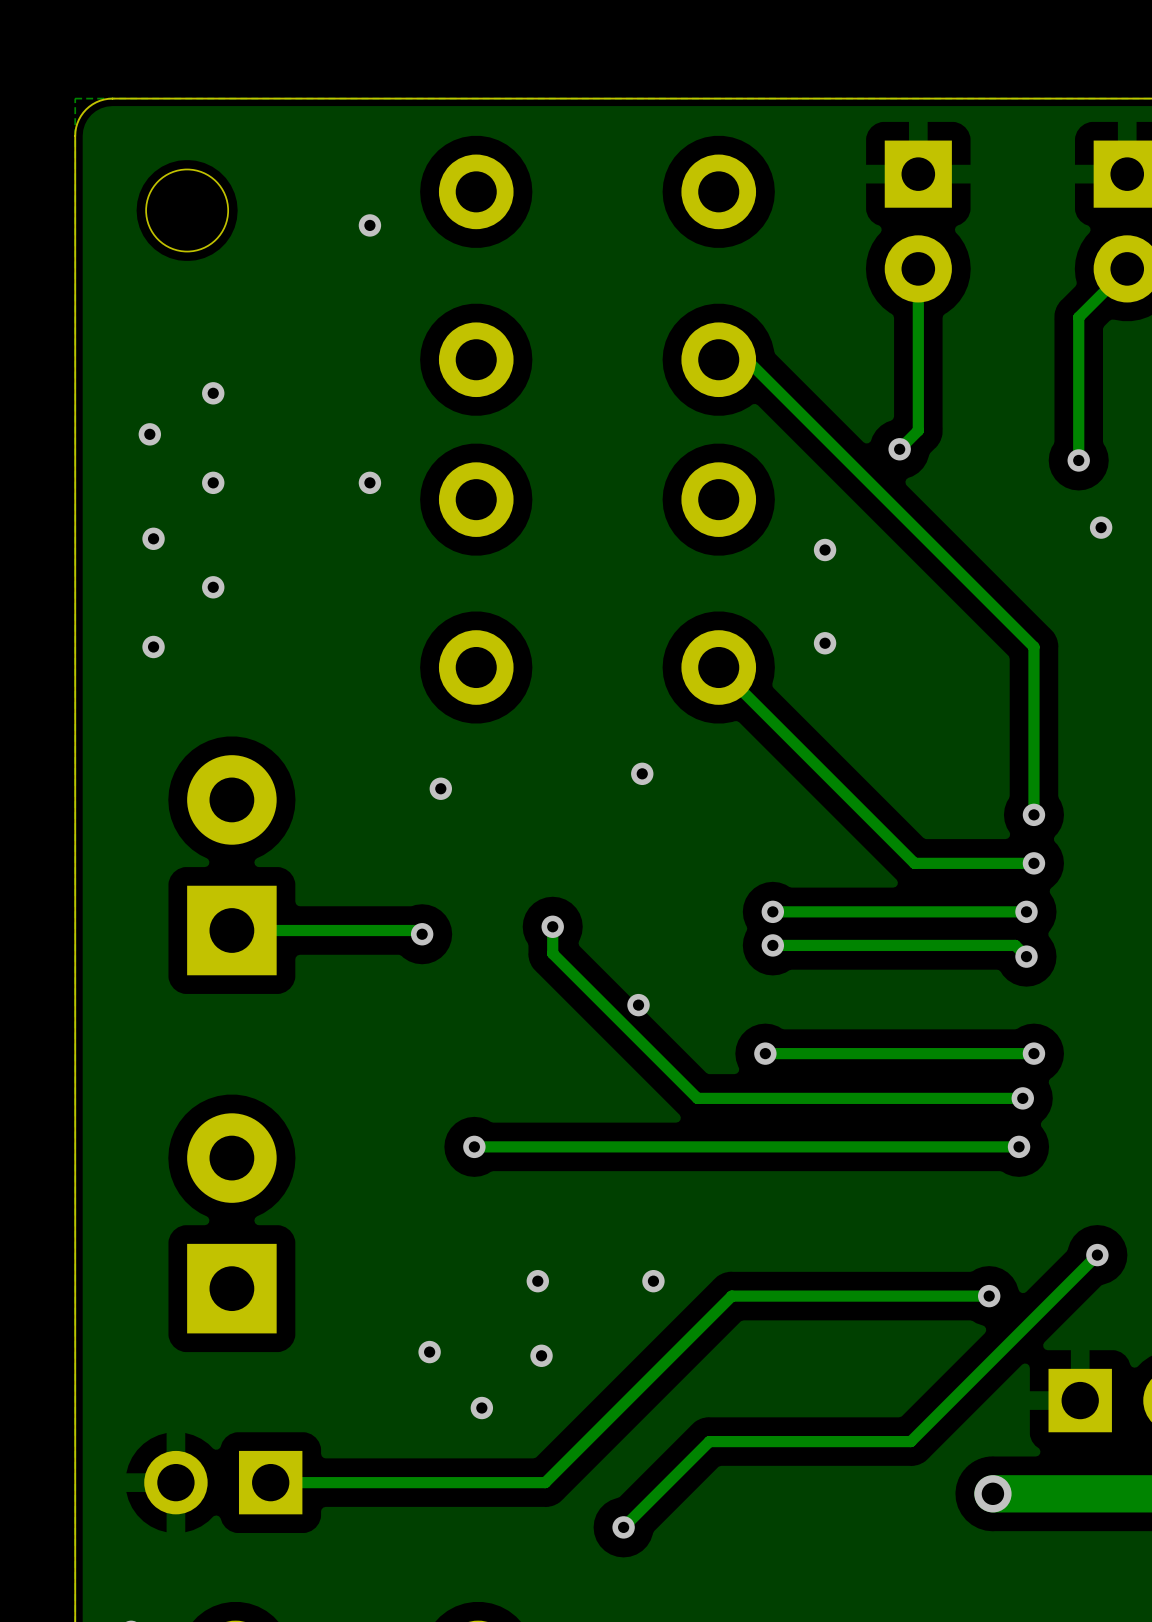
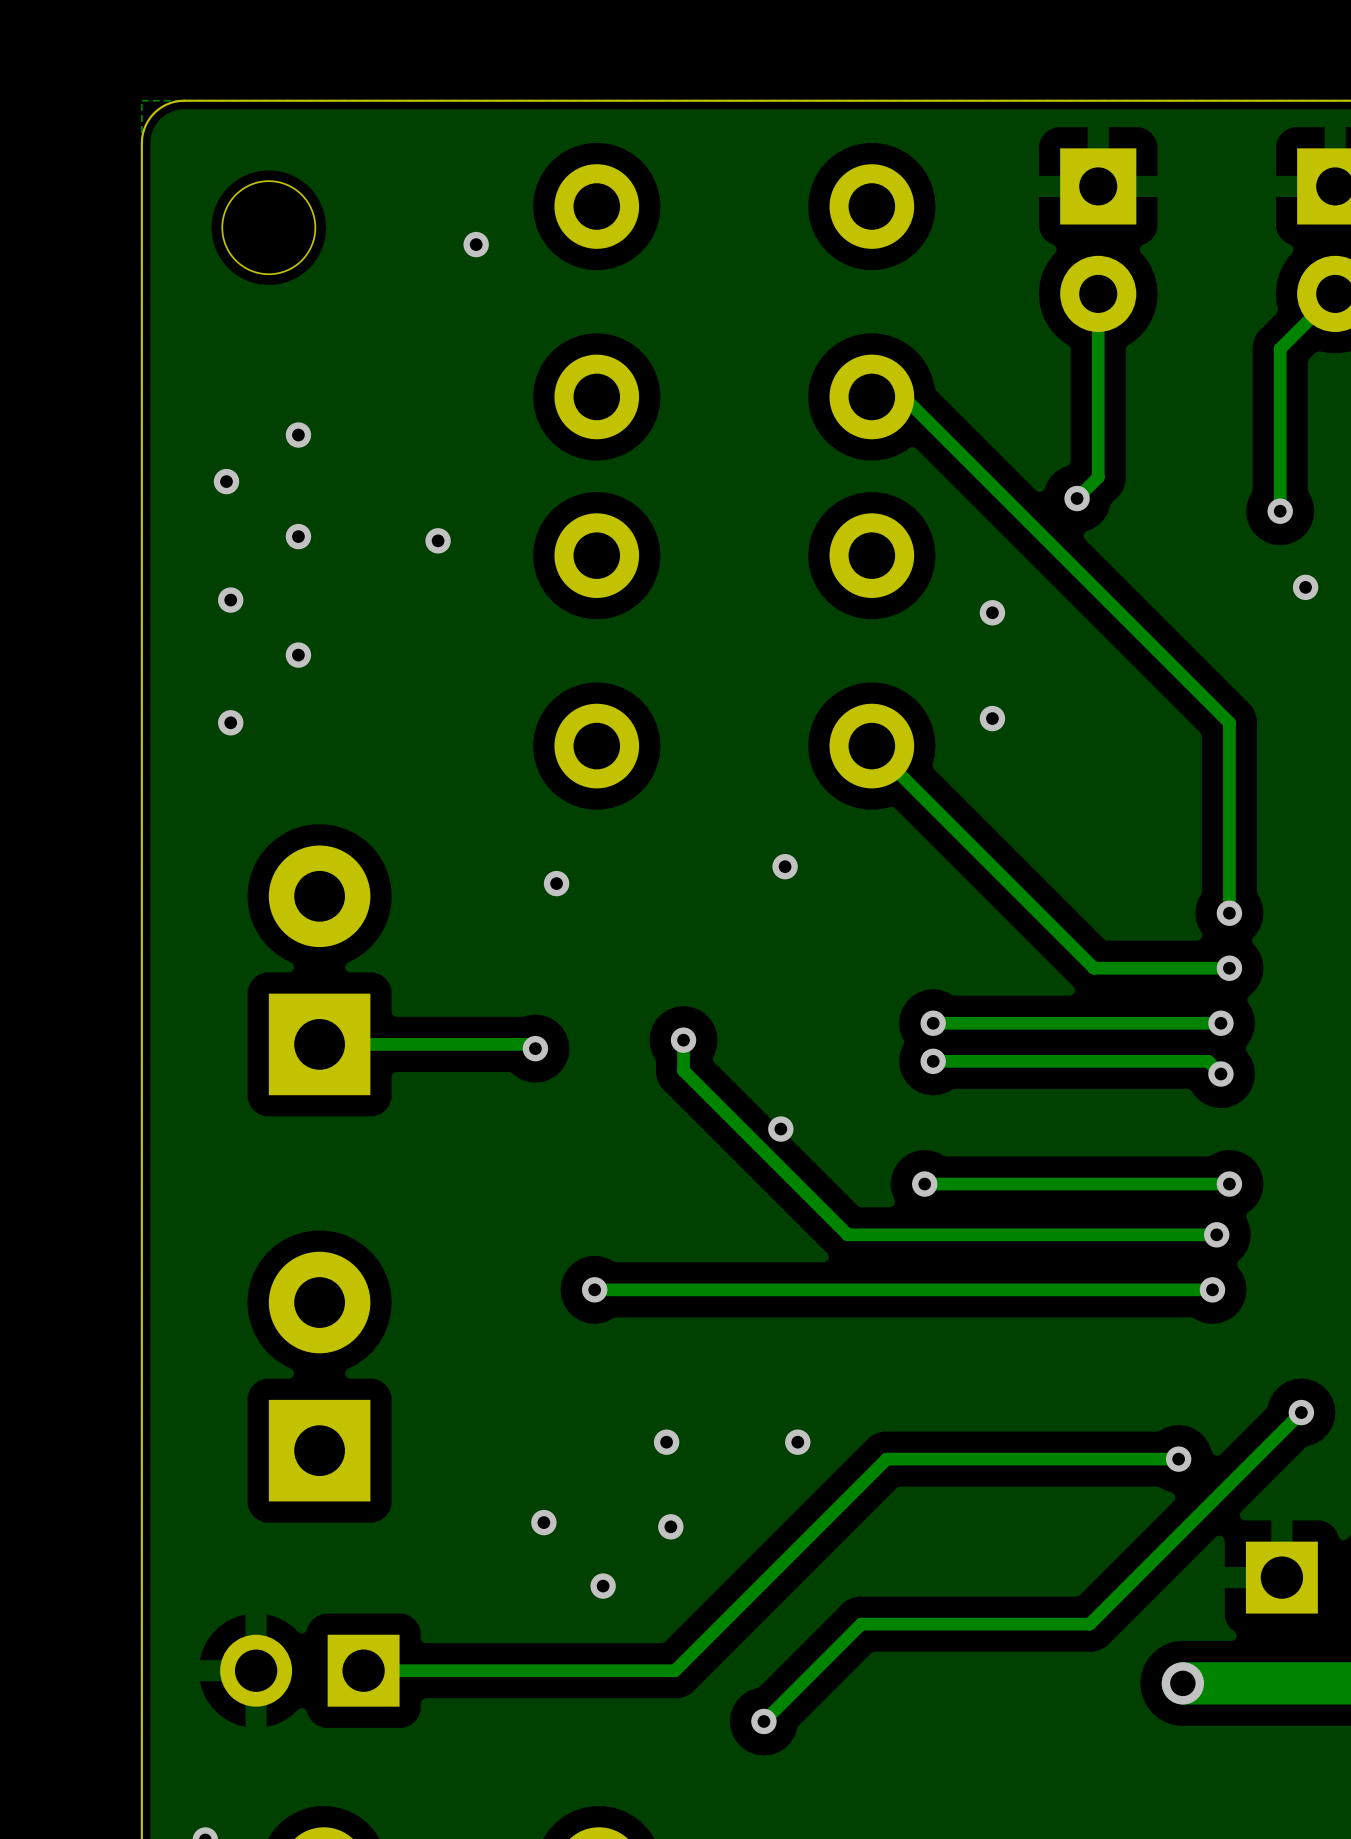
via position: (369, 482) -> (438, 540)

